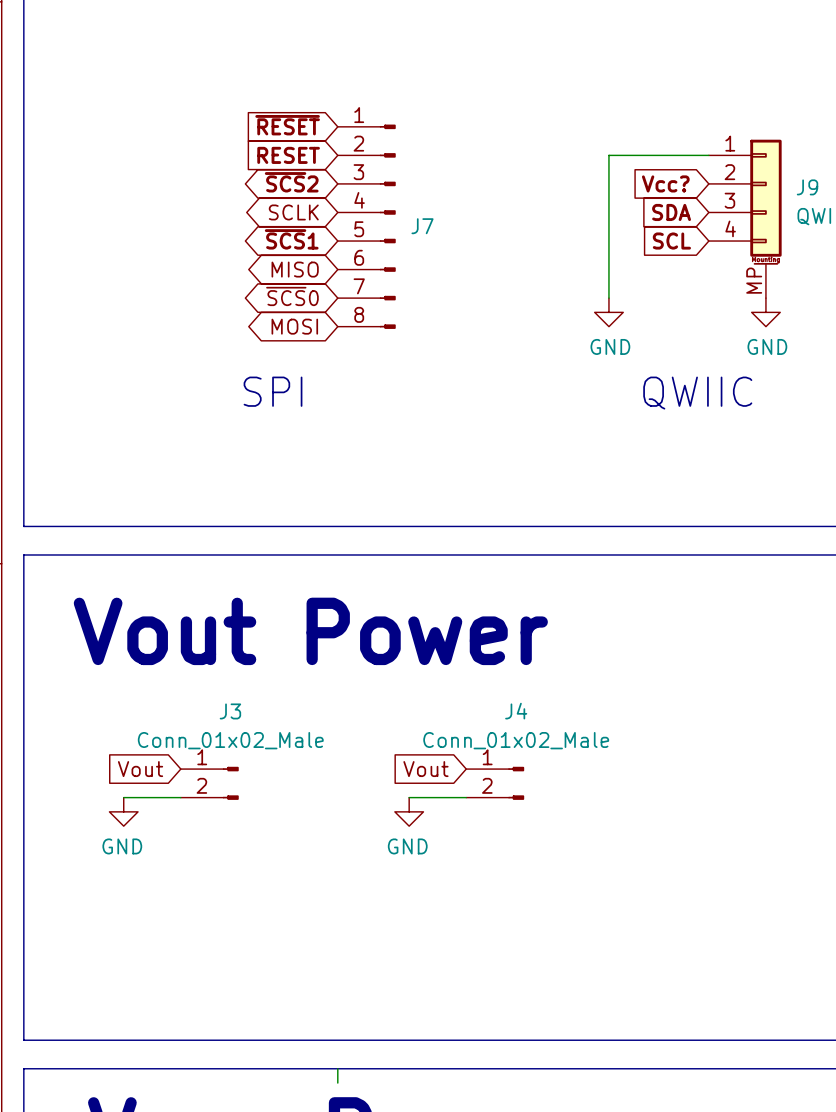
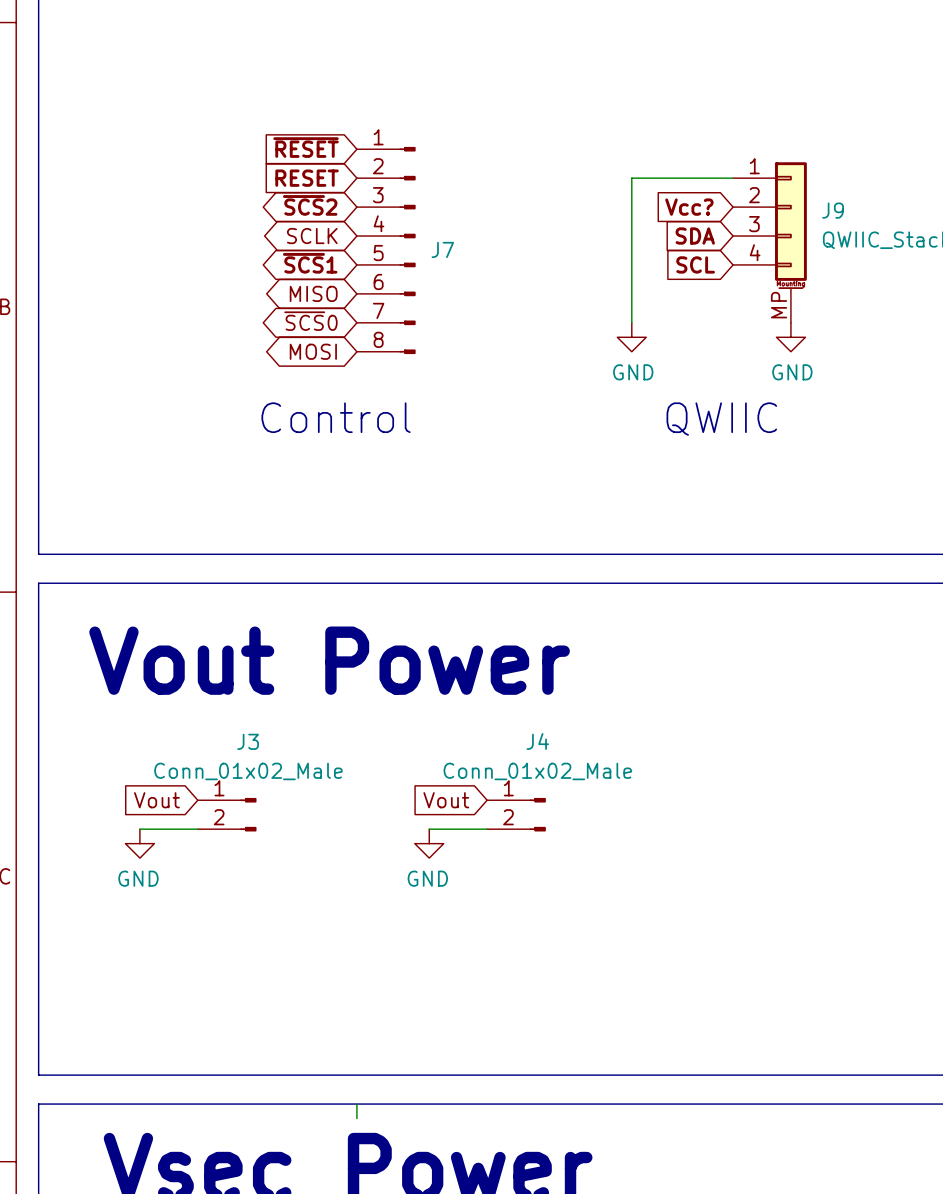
text: SPI (273, 391) -> Control (336, 417)

